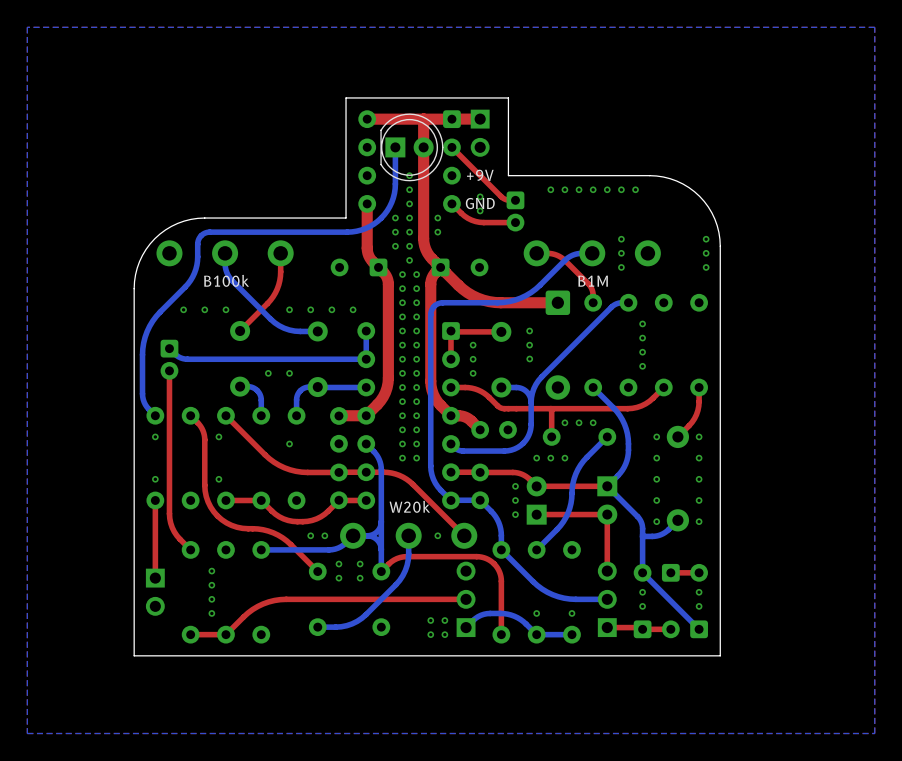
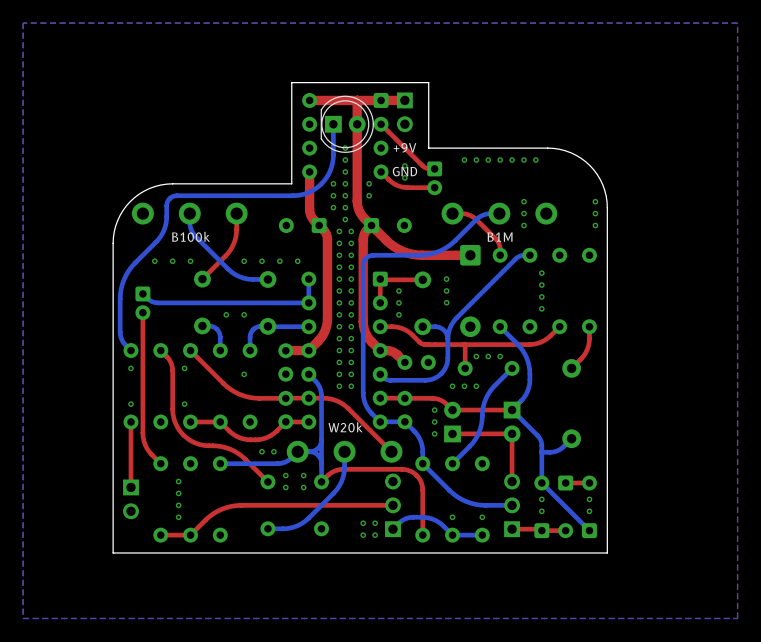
via: (656, 436) -> none
via: (699, 436) -> none
via: (656, 458) -> none
via: (699, 458) -> none
via: (656, 479) -> none
via: (699, 479) -> none
via: (656, 500) -> none
via: (699, 500) -> none
via: (656, 521) -> none
via: (699, 521) -> none
via: (437, 535) -> none

